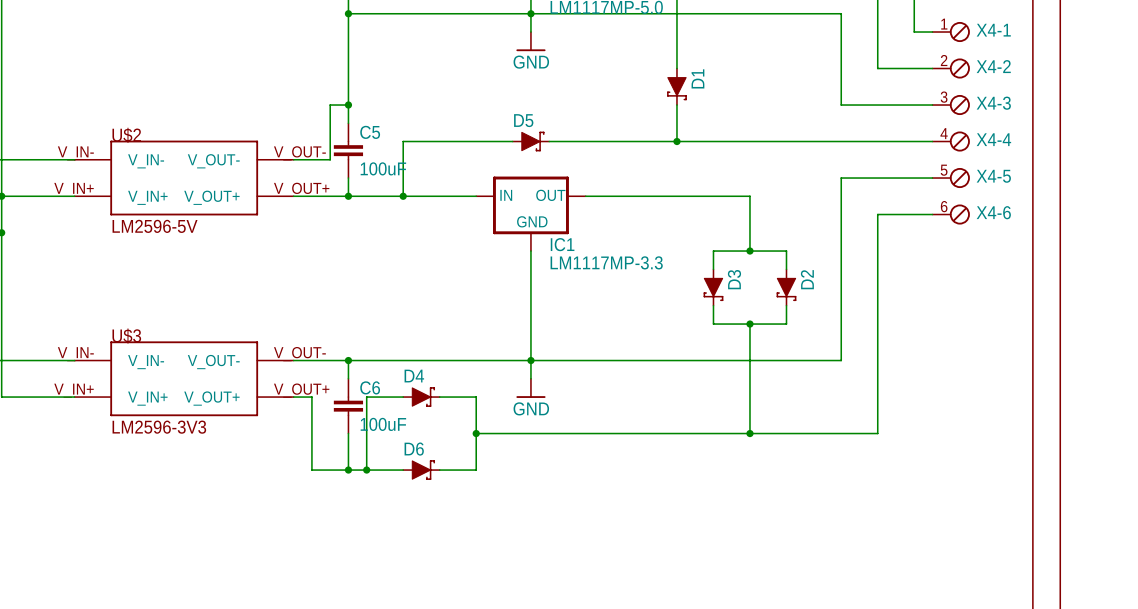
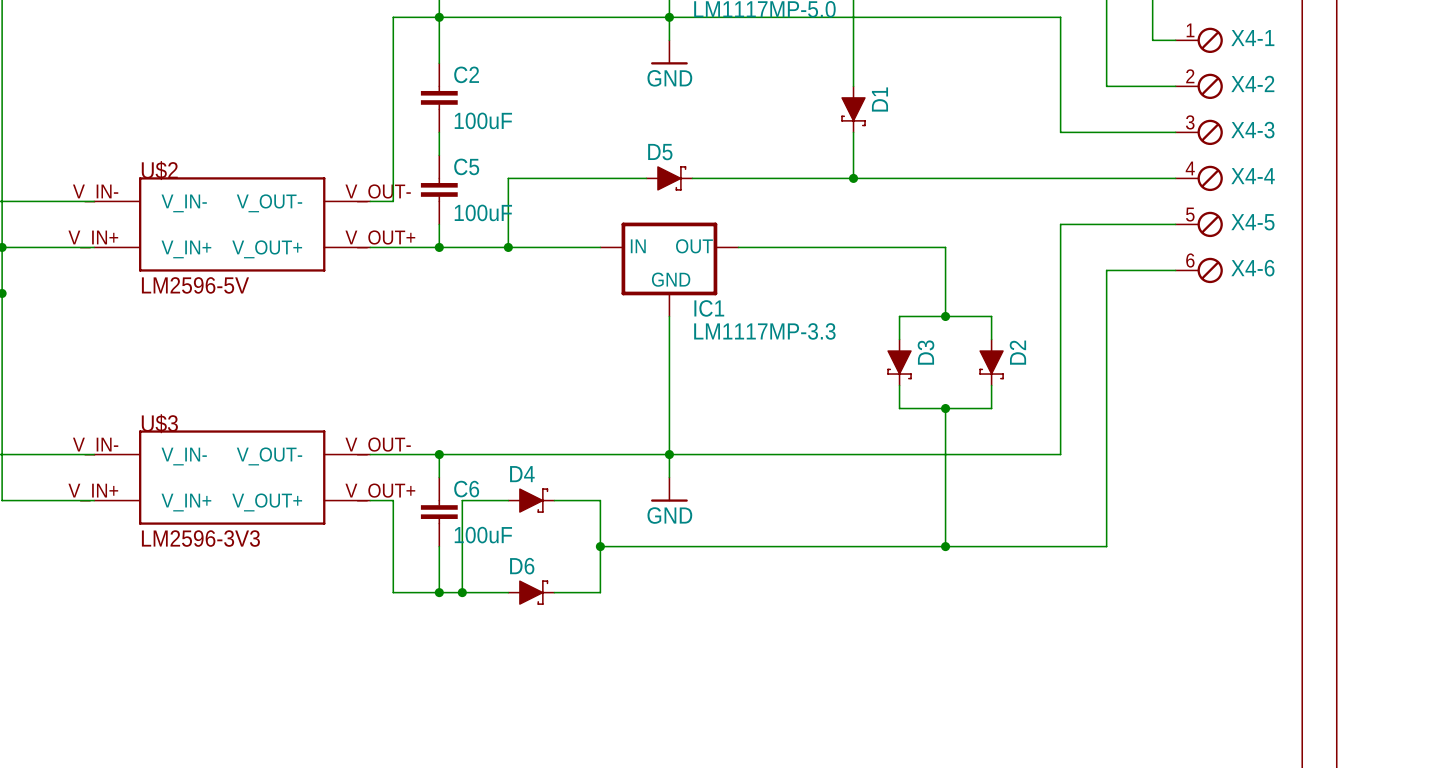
wire: (348, 50) (348, 105) (330, 105) (330, 159) (311, 159) -> (439, 17) (393, 17) (393, 201)
C2: none -> 100uF (439, 97)
junction: (348, 105) -> none

